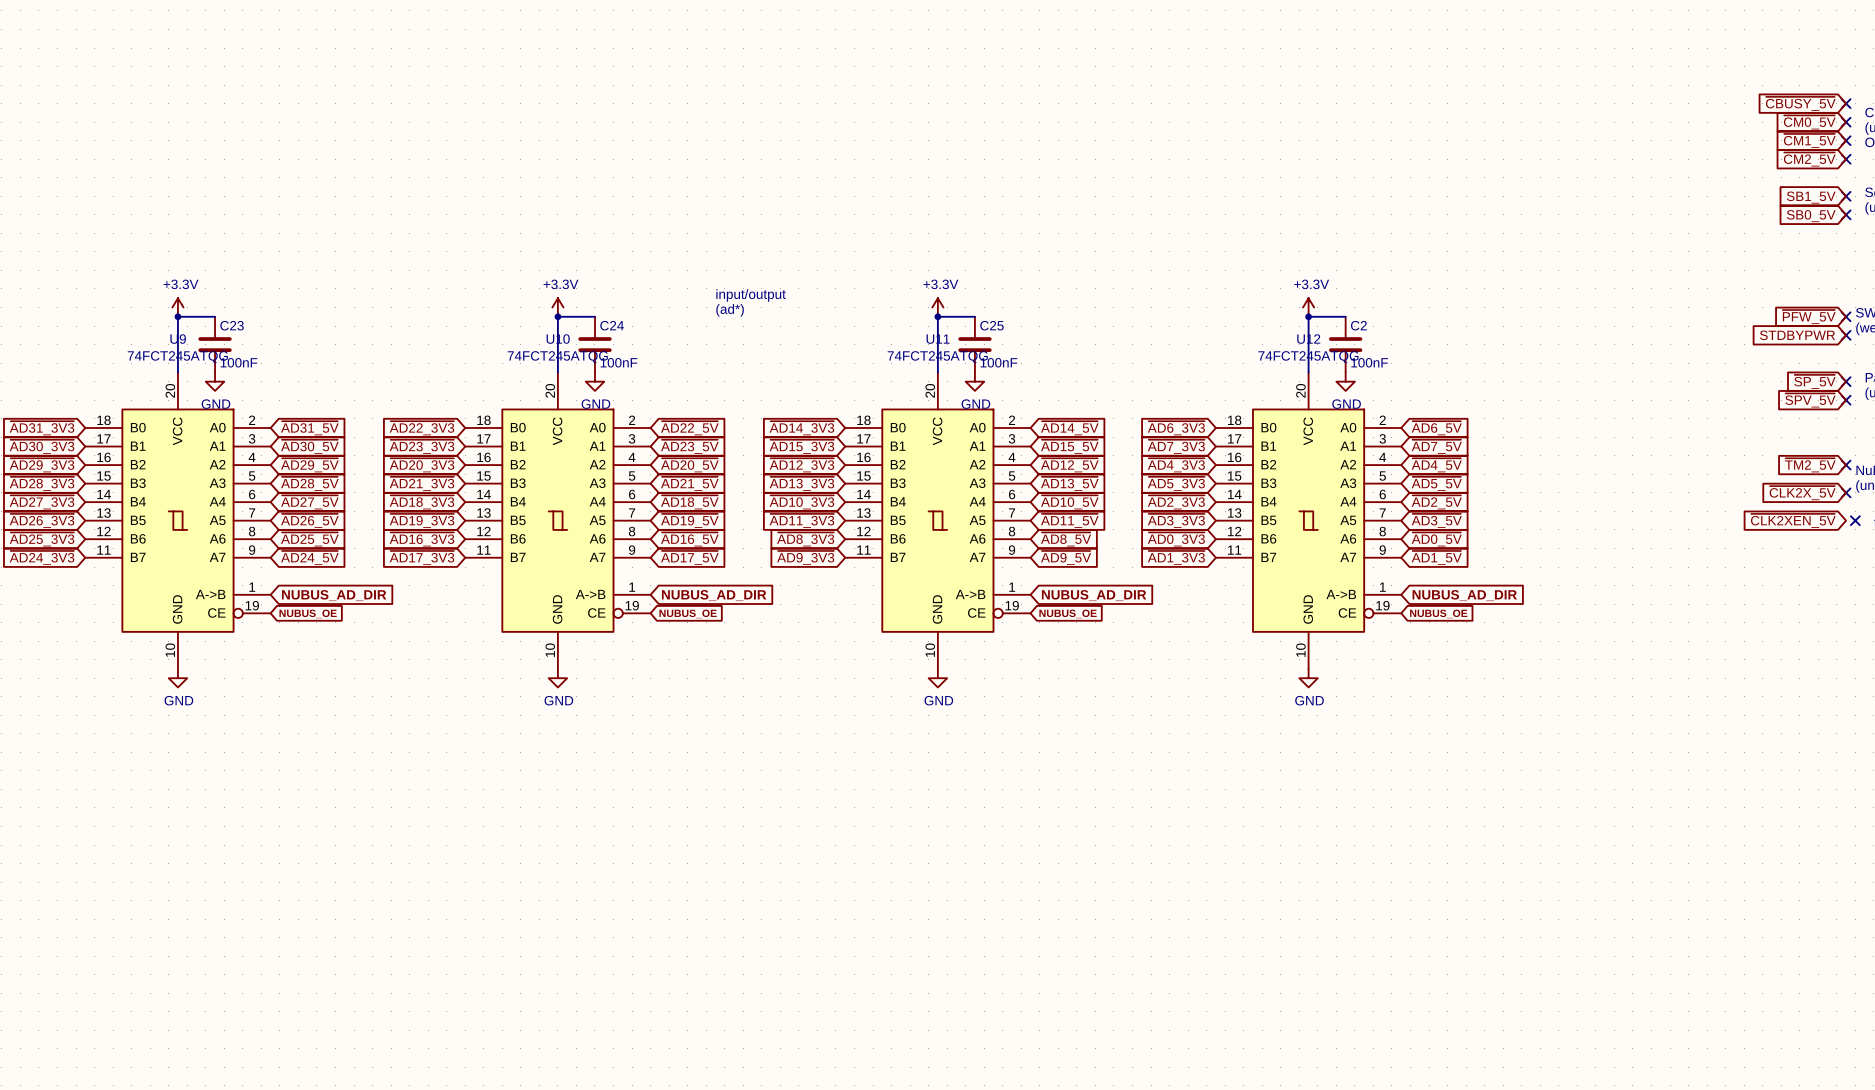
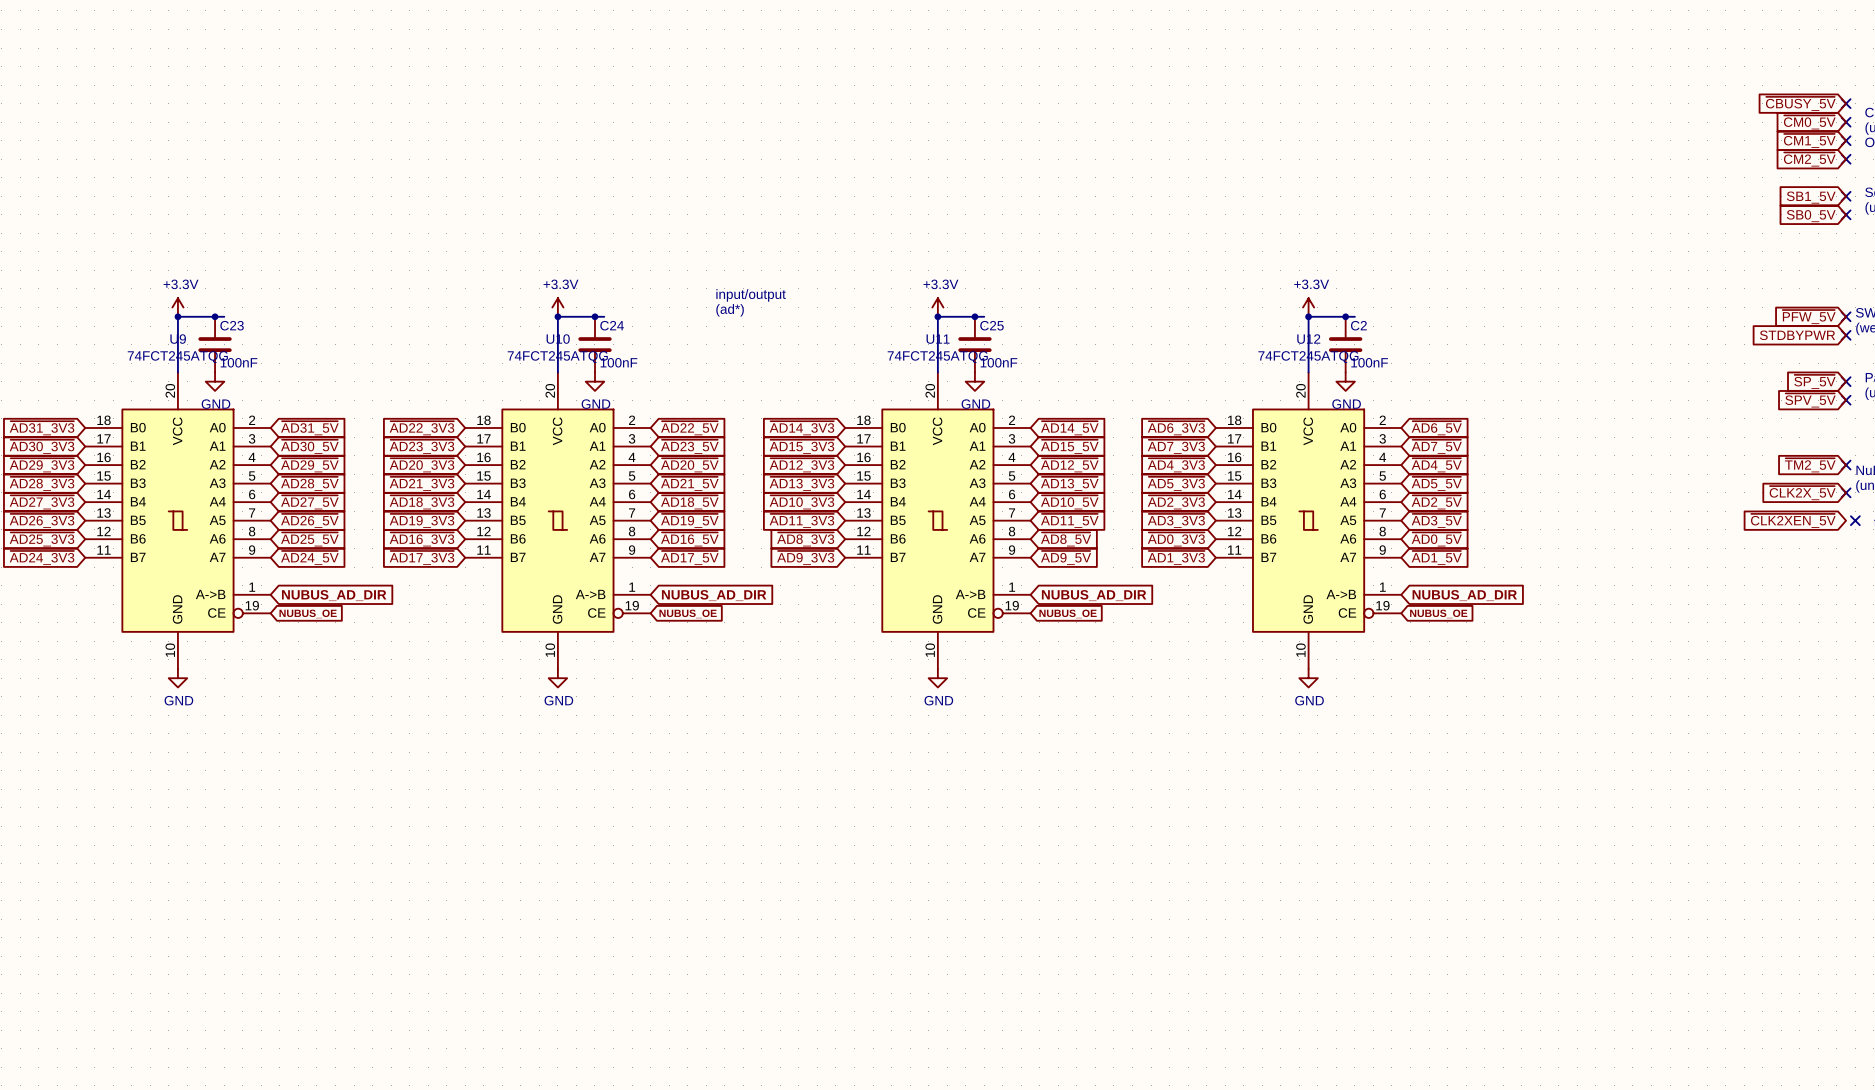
wire: none -> (215, 316) (224, 316)
junction: none -> (215, 316)
wire: none -> (594, 316) (604, 316)
junction: none -> (594, 316)
wire: none -> (974, 316) (984, 316)
junction: none -> (974, 316)
wire: none -> (1345, 316) (1354, 316)
junction: none -> (1345, 316)

